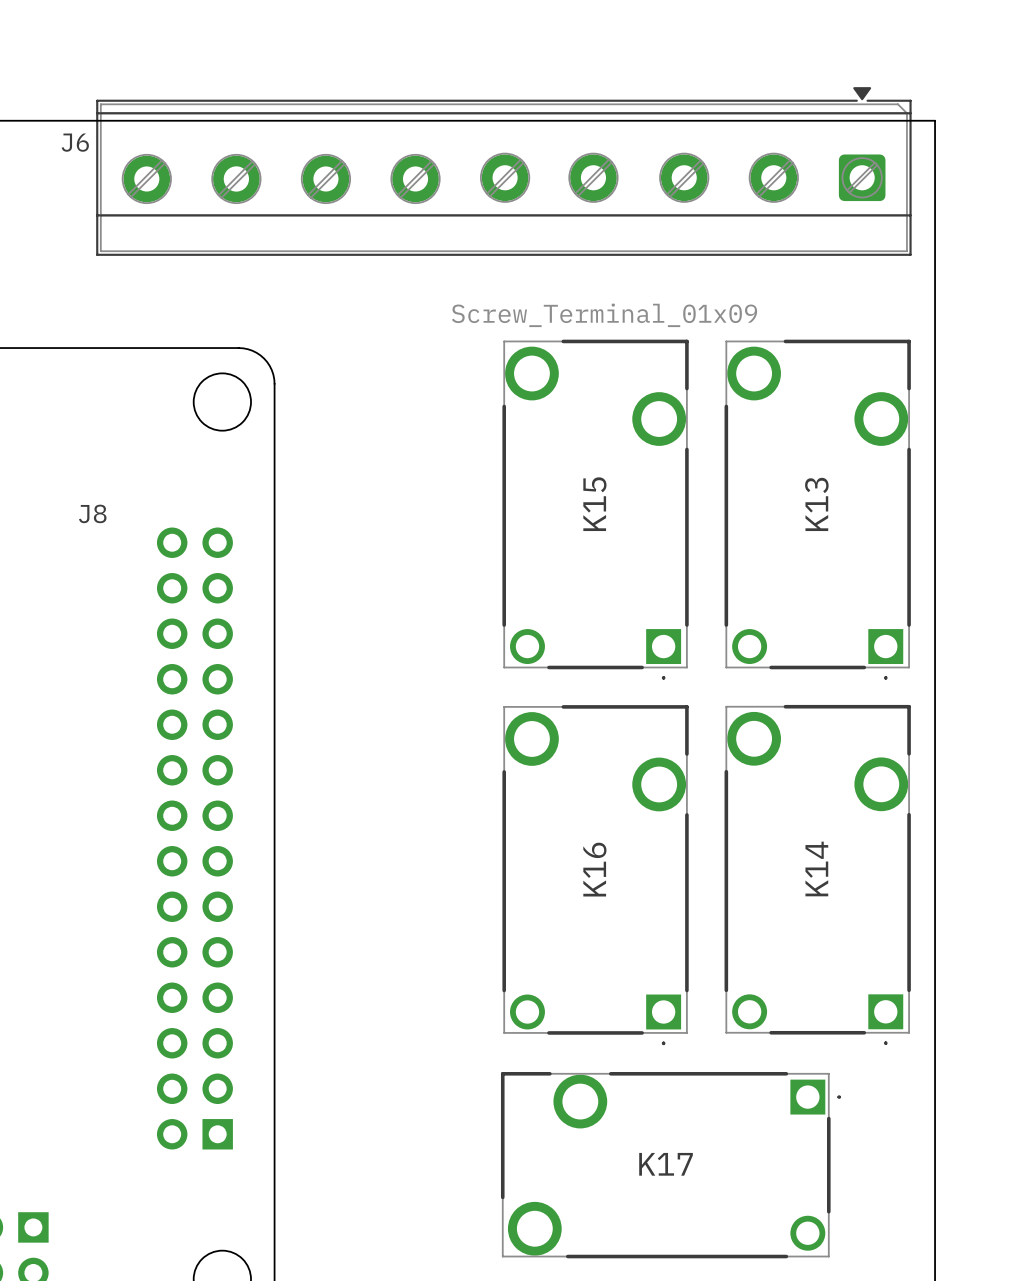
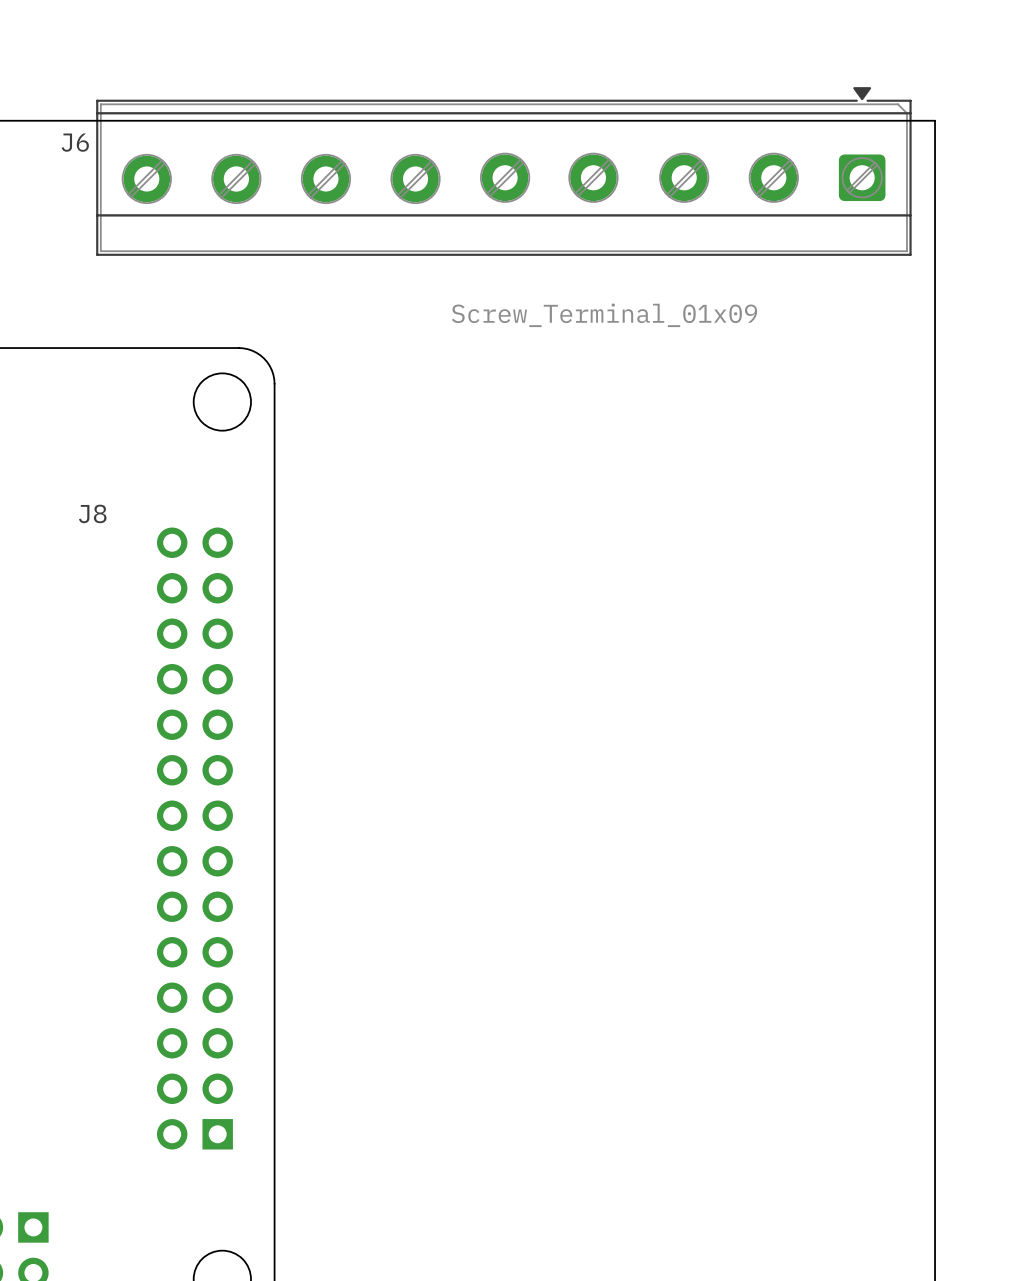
K15: (595, 509) -> none
K13: (817, 509) -> none
K14: (817, 874) -> none
K16: (595, 875) -> none
K17: (670, 1165) -> none

